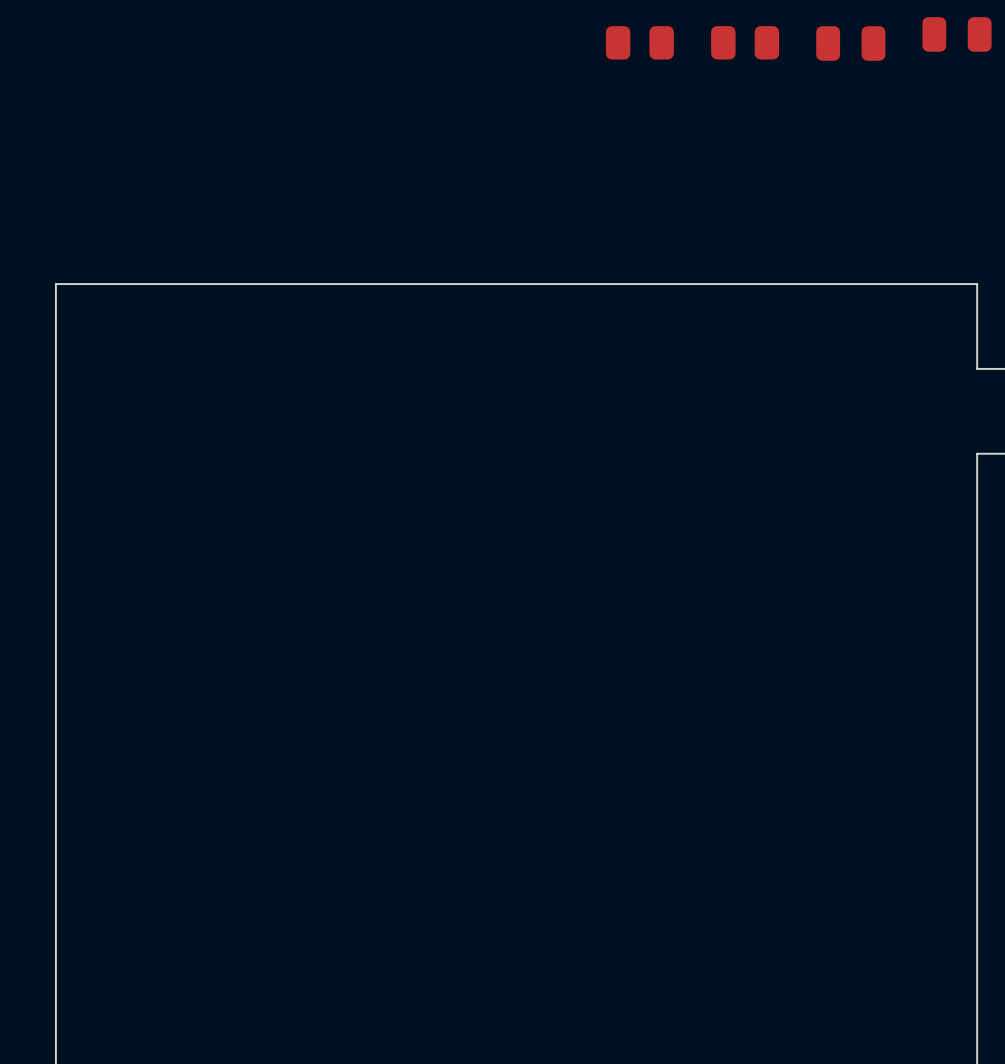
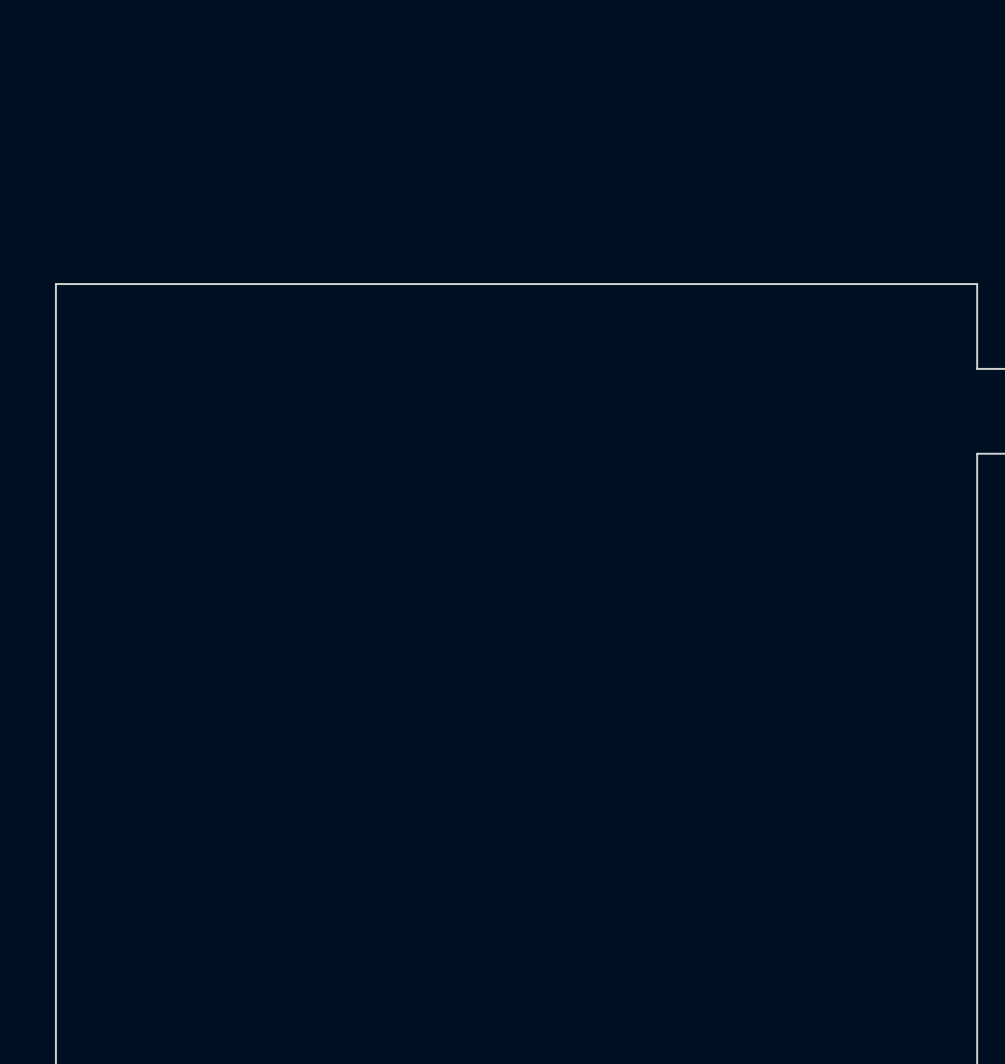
part: (957, 34) -> none
part: (639, 42) -> none
part: (745, 42) -> none
part: (850, 43) -> none

